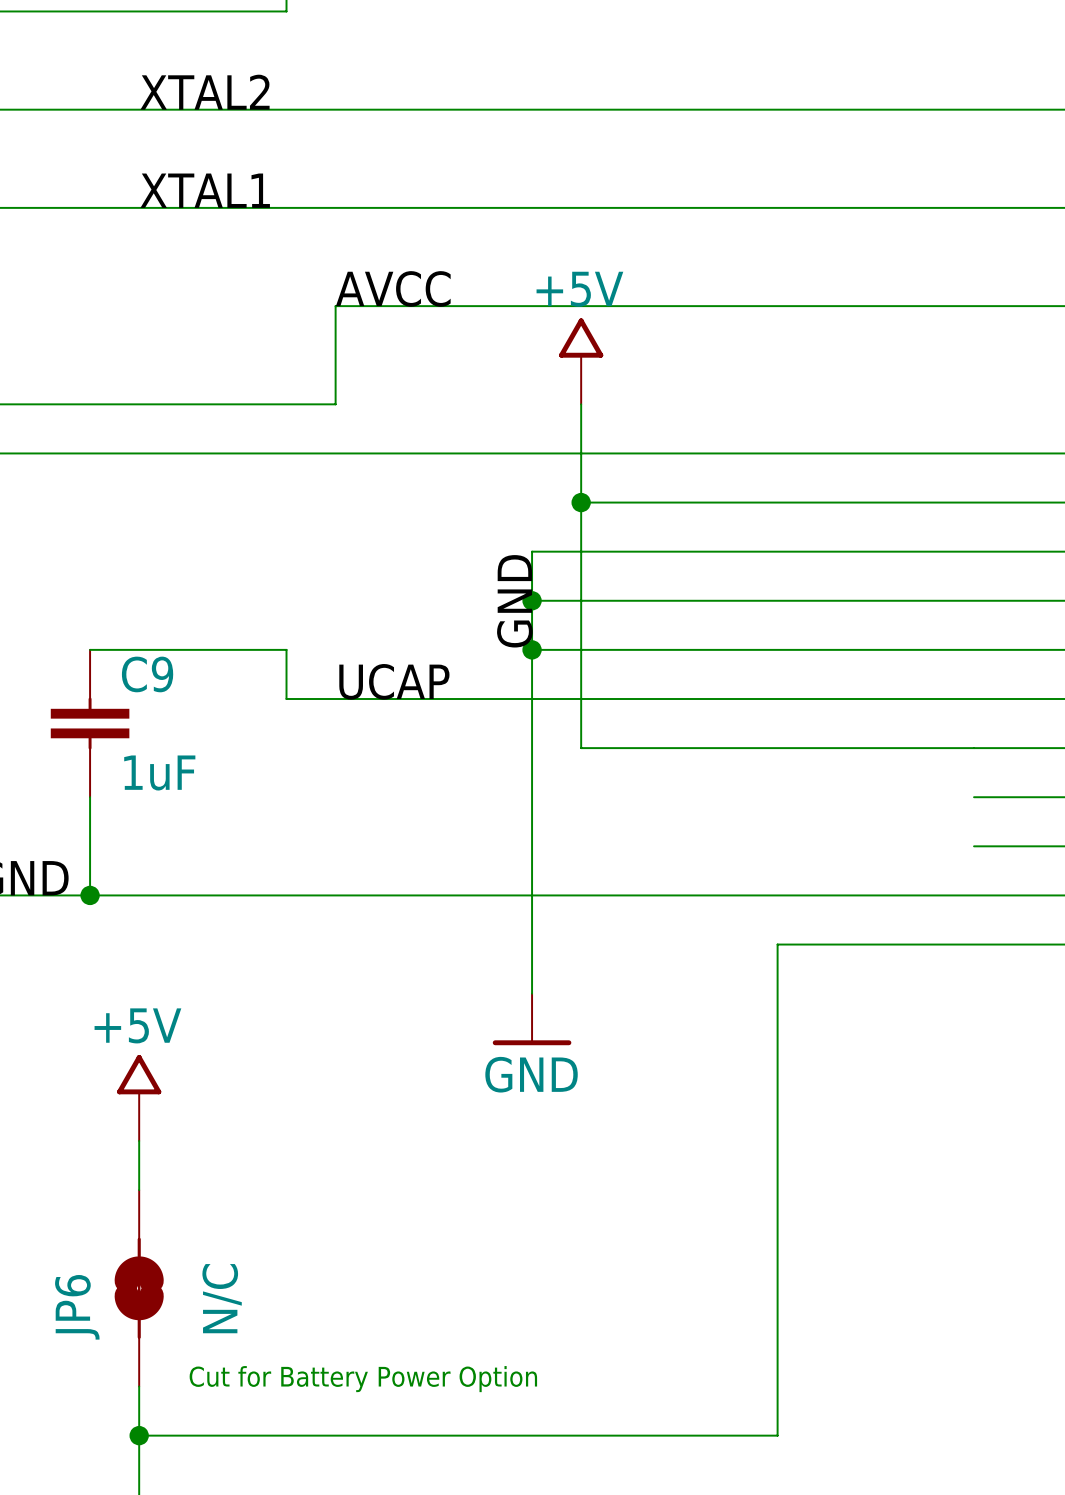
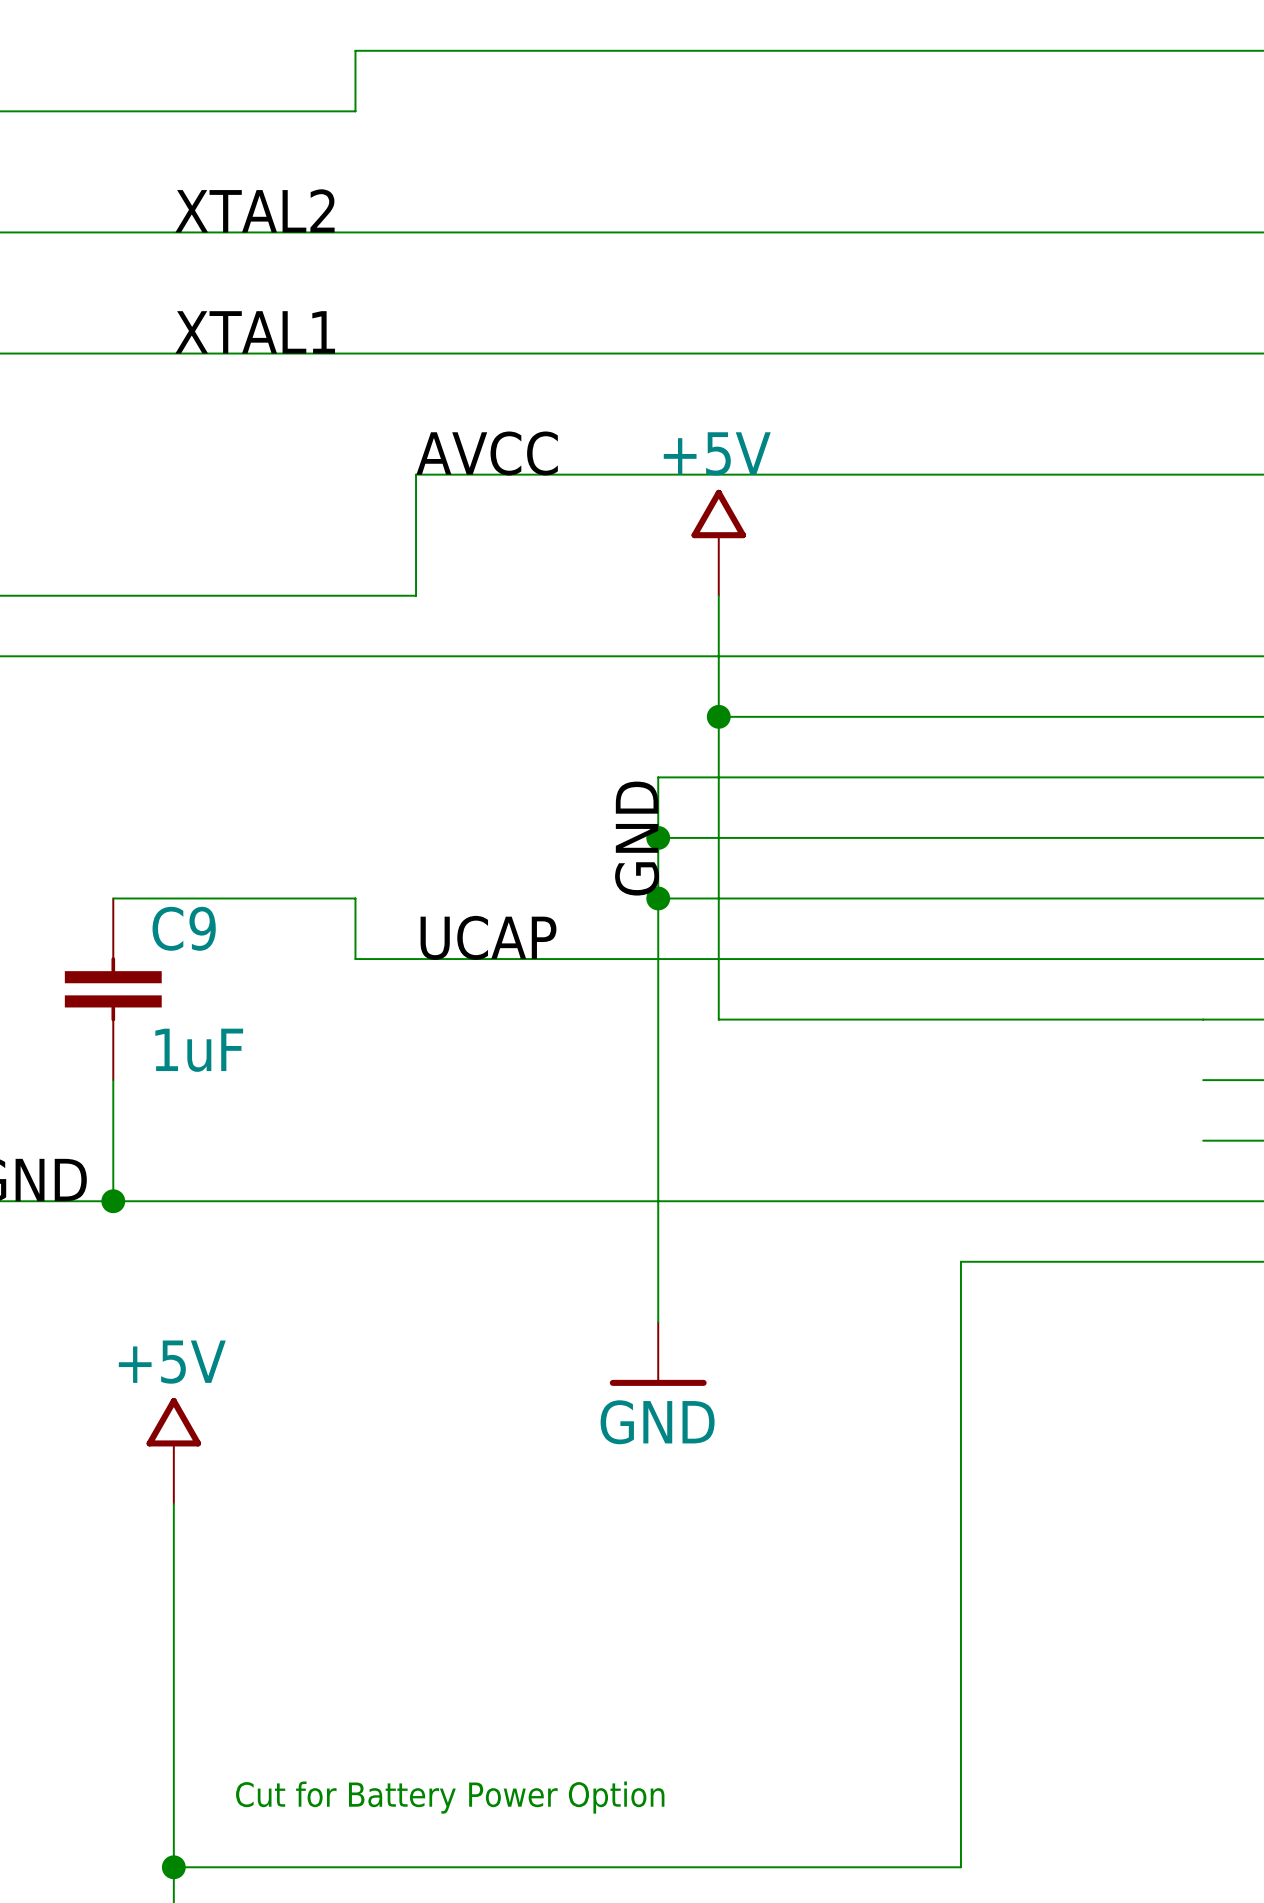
JP6: N/C (139, 1288) -> none

